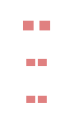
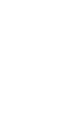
part: (36, 25) -> none
part: (36, 62) -> none
part: (36, 99) -> none

